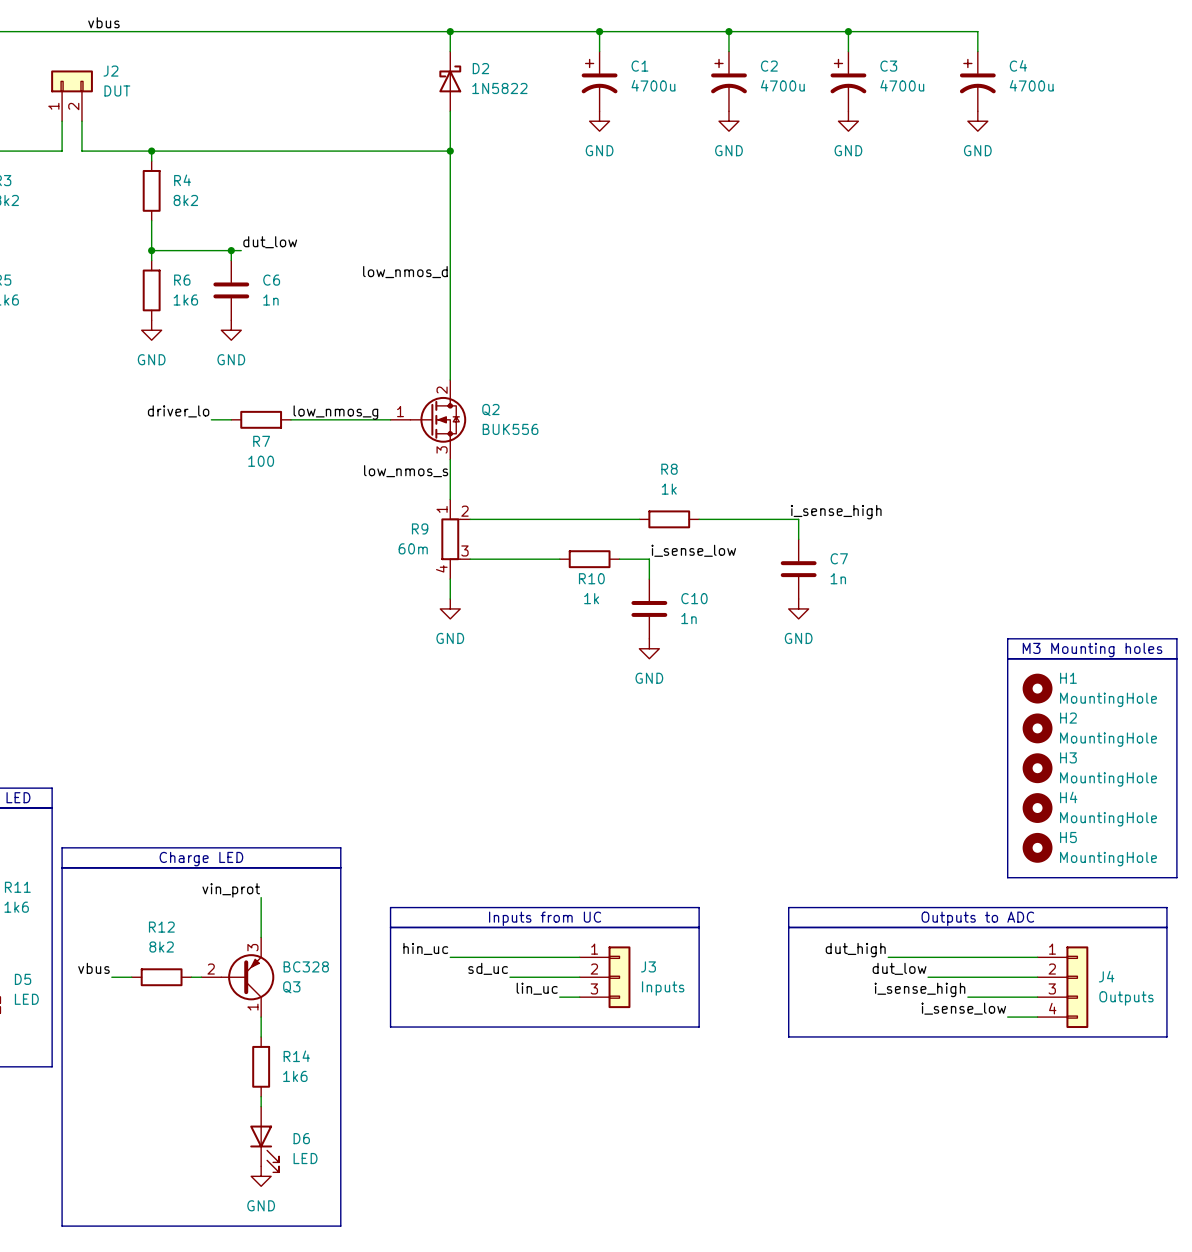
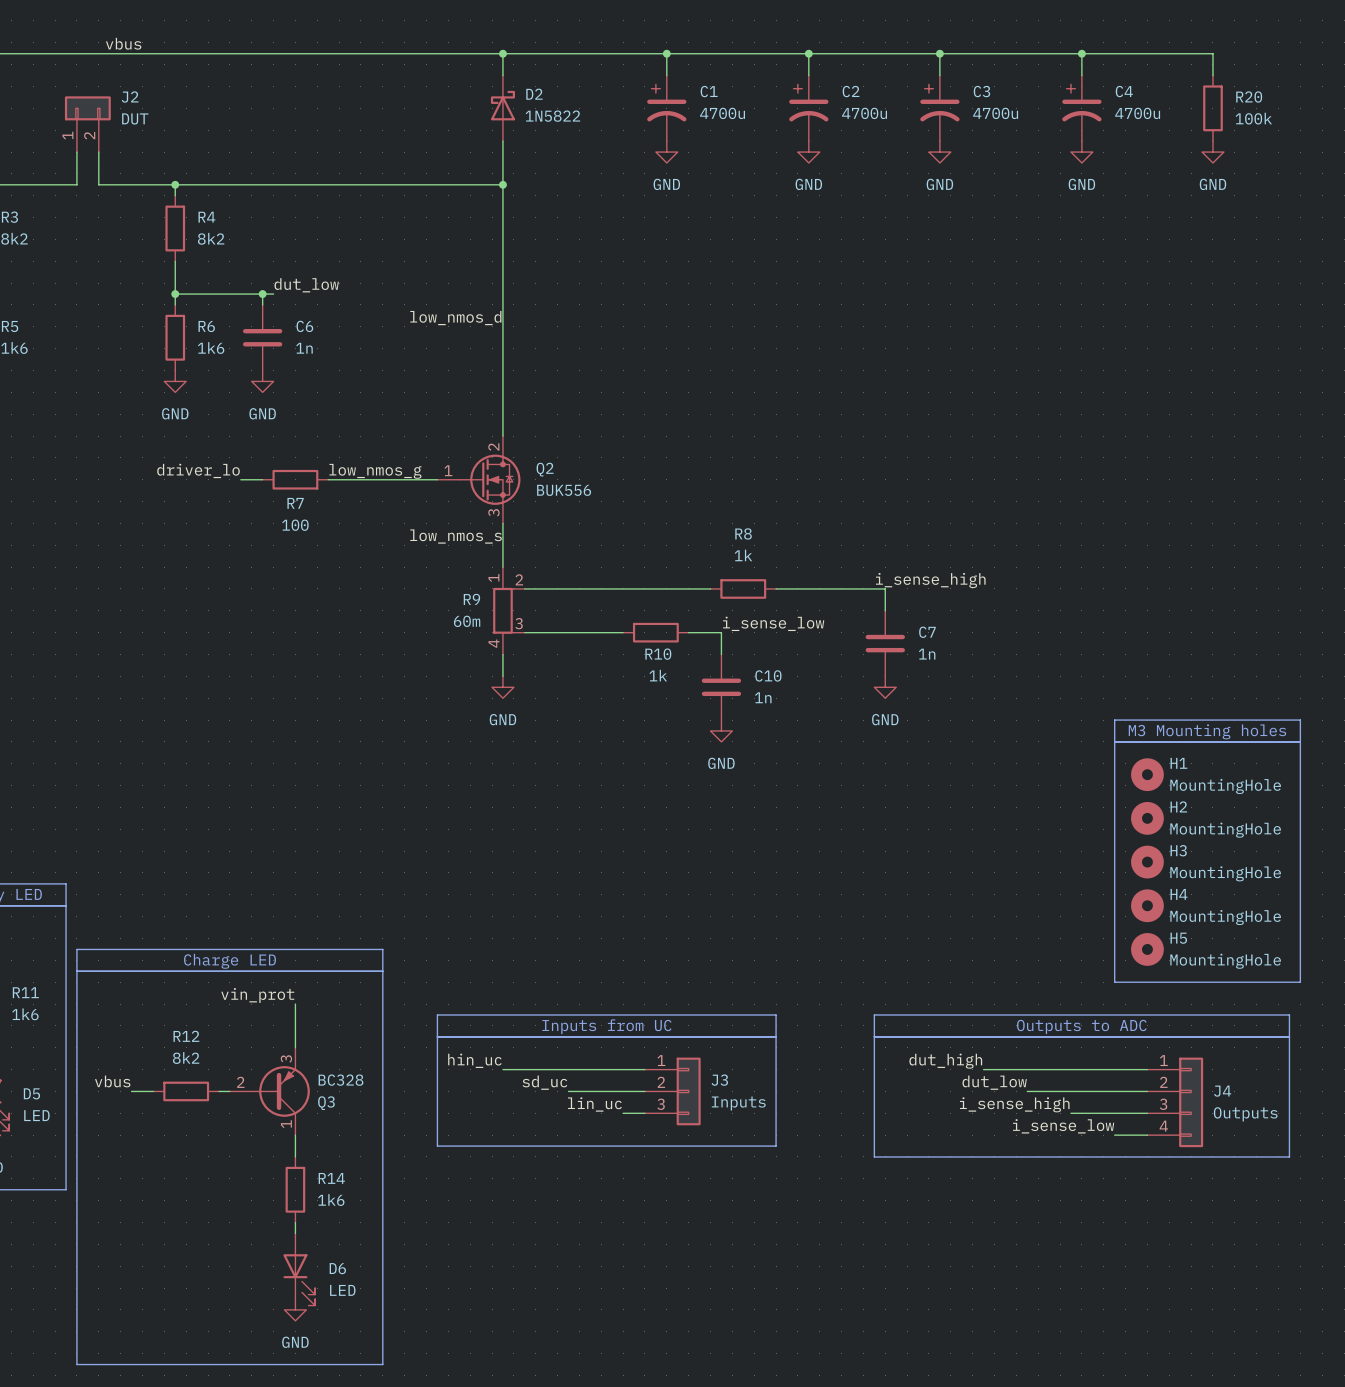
wire: none -> (1081, 53) (1212, 53) (1212, 75)
junction: none -> (1081, 53)
R20: none -> 100k (1212, 108)
power symbol: none -> GND (1212, 152)

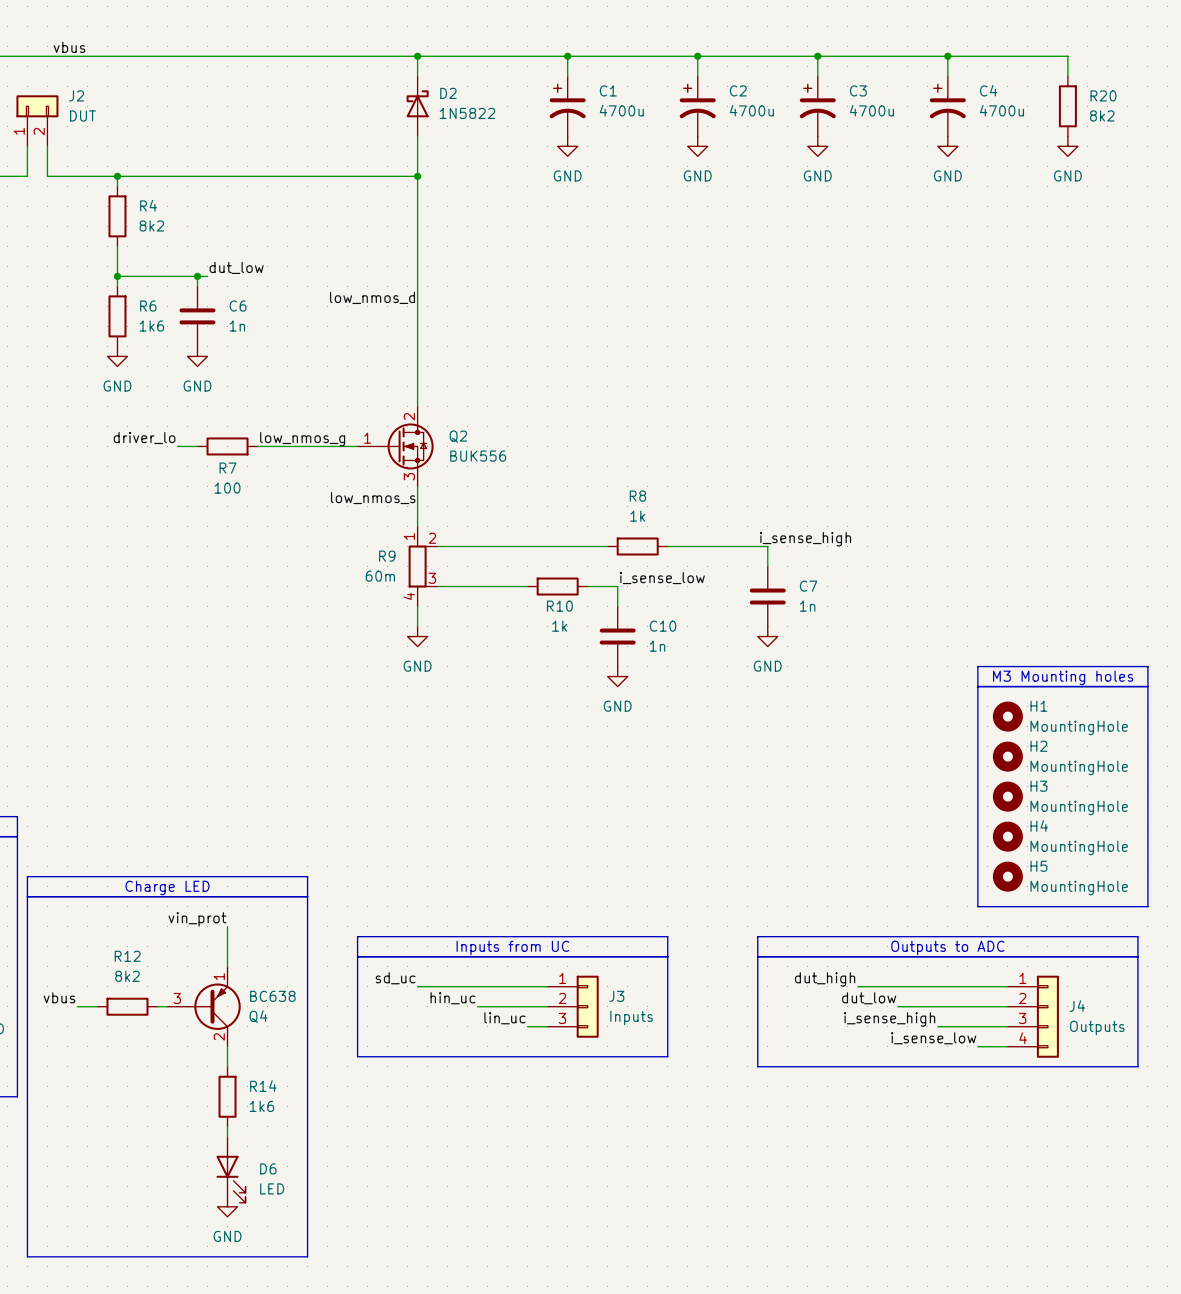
R20 value: 100k (1253, 118) -> 8k2 (1102, 115)
Q3 pin number: 3 (286, 1058) -> 1 (219, 976)
label: hin_uc (474, 1060) -> sd_uc (395, 978)
Q3 value: BC328 (341, 1080) -> BC638 (272, 996)
Q3 pin number: 2 (240, 1082) -> 3 (177, 998)
label: sd_uc (544, 1082) -> hin_uc (453, 998)
Q3 name: Q3 (326, 1103) -> Q4 (258, 1016)
Q3 pin number: 1 (286, 1124) -> 2 (219, 1036)

